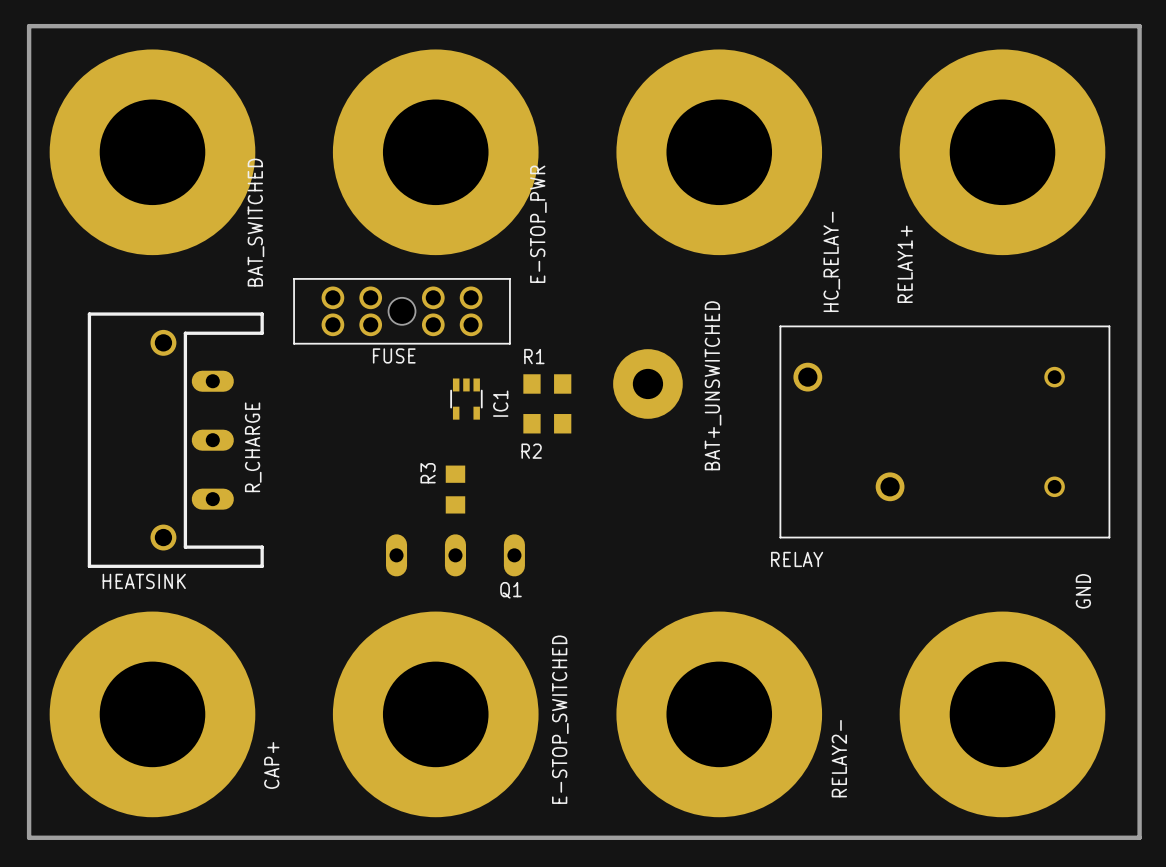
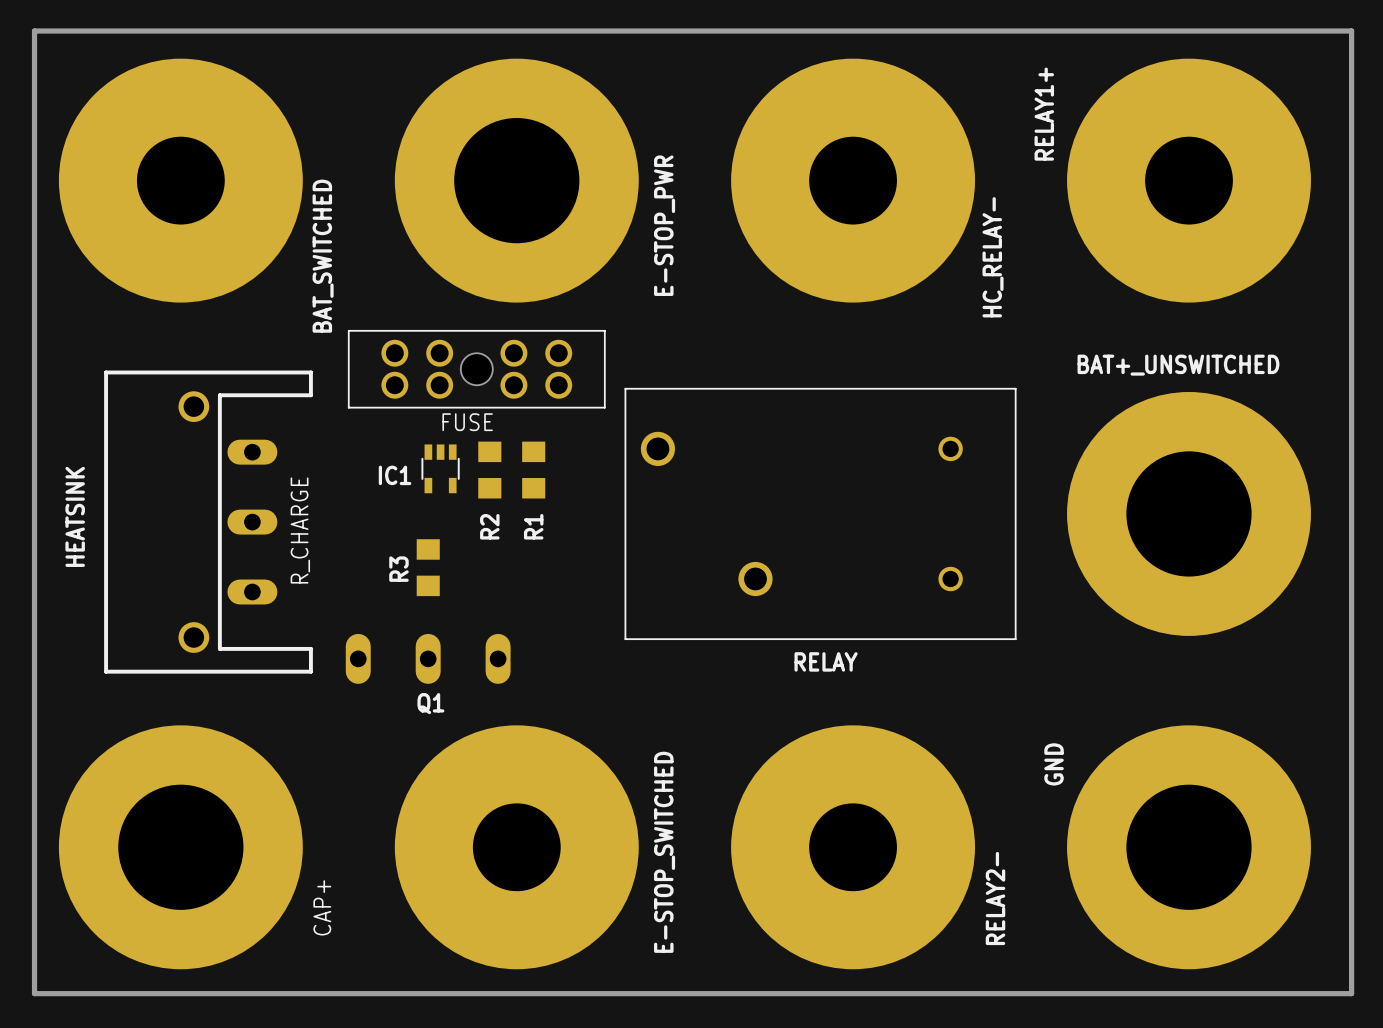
BAT_SWITCHED footprint: [49, 49, 256, 256] -> [58, 58, 303, 303]
HC_RELAY- footprint: [616, 49, 823, 256] -> [731, 58, 976, 303]
RELAY1+ footprint: [899, 49, 1106, 256] -> [1067, 58, 1311, 303]
E-STOP_PWR name position: E-STOP_PWR (538, 224) -> E-STOP_PWR (664, 225)
HC_RELAY- name position: HC_RELAY- (831, 261) -> HC_RELAY- (993, 257)
RELAY1+ name position: RELAY1+ (905, 264) -> RELAY1+ (1044, 114)
R1 name position: R1 (534, 356) -> R1 (533, 526)
R1 rotation: 0° (547, 383) -> 90° clockwise (533, 470)
R1 position: (547, 383) -> (533, 470)
BAT+_UNSWITCHED: (647, 383) -> none
IC1 position: (466, 399) -> (440, 468)
IC1 name rotation: 0° (500, 403) -> 90° clockwise (395, 475)
IC1 name position: IC1 (500, 403) -> IC1 (395, 475)
R2 rotation: 0° (547, 423) -> 90° clockwise (489, 470)
R2 position: (547, 423) -> (489, 470)
RELAY position: (944, 431) -> (820, 513)
BAT+_UNSWITCHED: none -> (1188, 513)
R2 name position: R2 (531, 451) -> R2 (489, 526)
R3 name position: R3 (428, 473) -> R3 (398, 569)
R3 position: (455, 489) -> (428, 567)
Q1 position: (455, 555) -> (428, 658)
RELAY name position: RELAY (797, 559) -> RELAY (826, 661)
HEATSINK name rotation: 0° (144, 581) -> 90° counterclockwise (75, 516)
HEATSINK name position: HEATSINK (144, 581) -> HEATSINK (75, 516)
Q1 name position: Q1 (510, 590) -> Q1 (430, 703)
GND name position: GND (1083, 591) -> GND (1054, 764)
E-STOP_SWITCHED footprint: [332, 611, 539, 818] -> [394, 725, 639, 970]
RELAY2- footprint: [616, 611, 823, 818] -> [731, 725, 976, 970]

